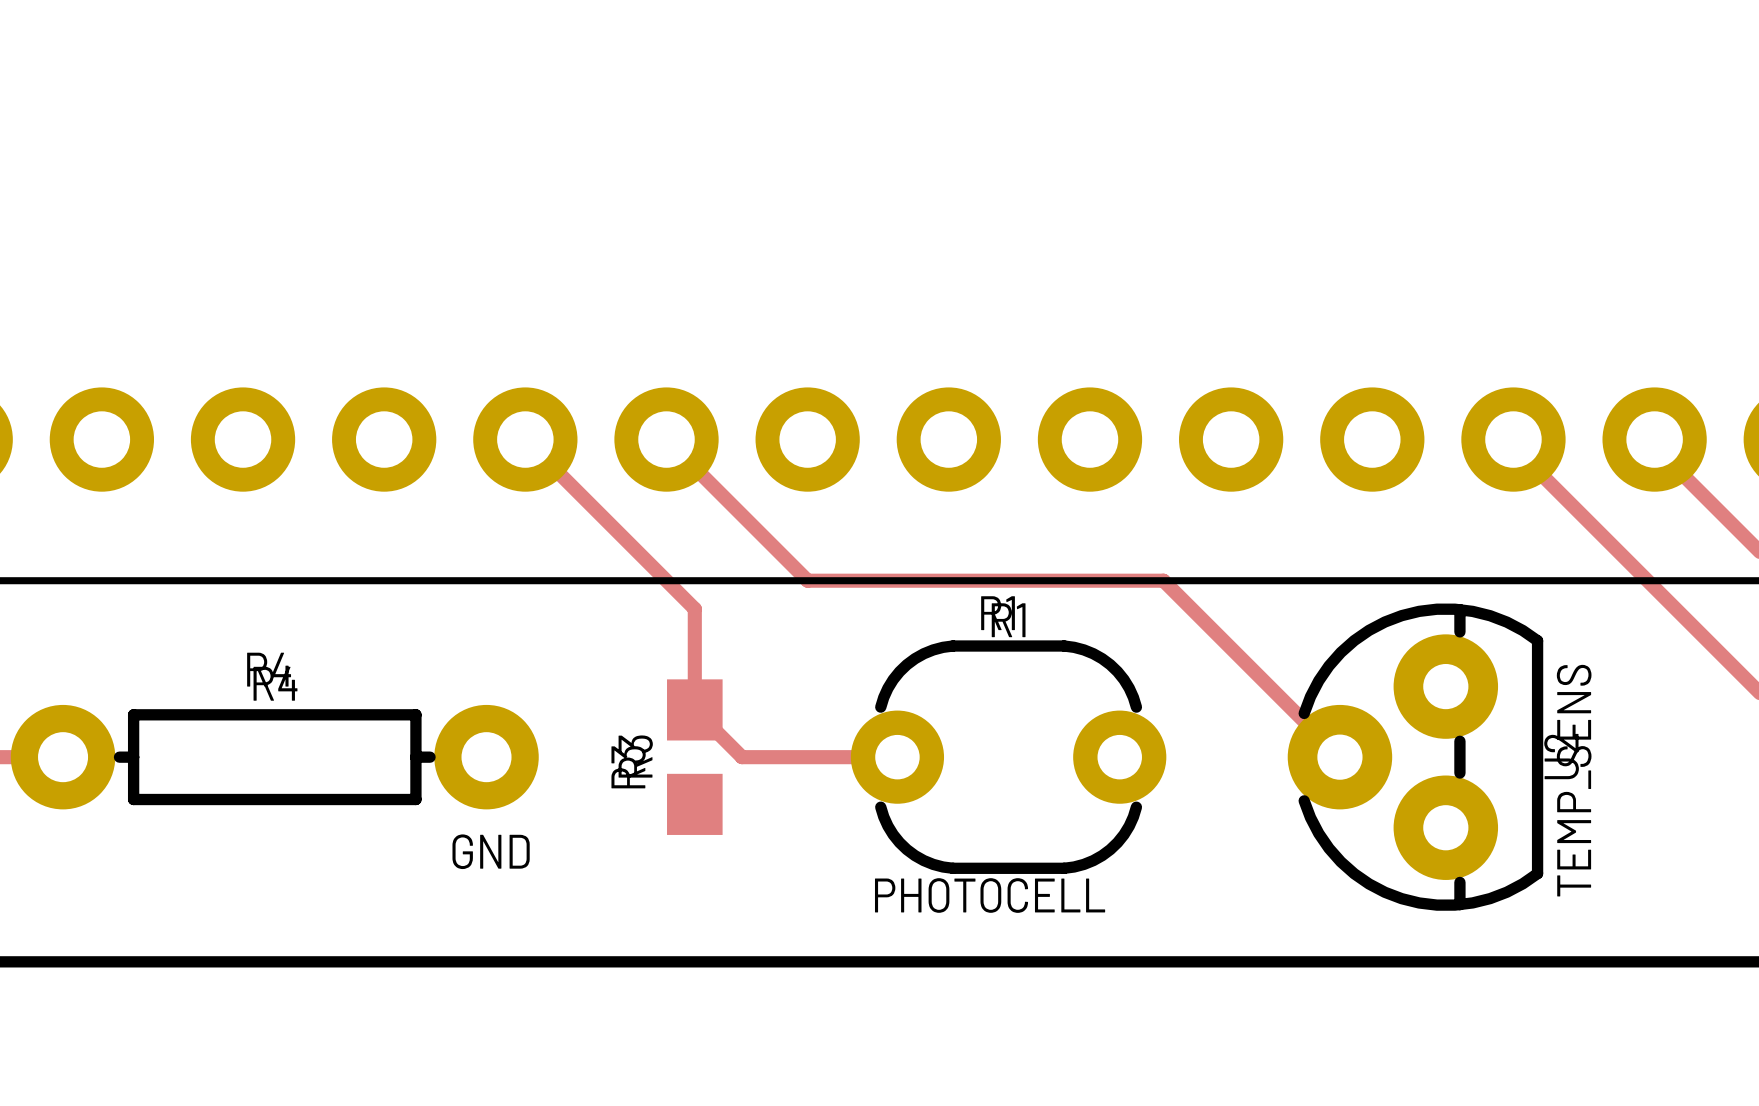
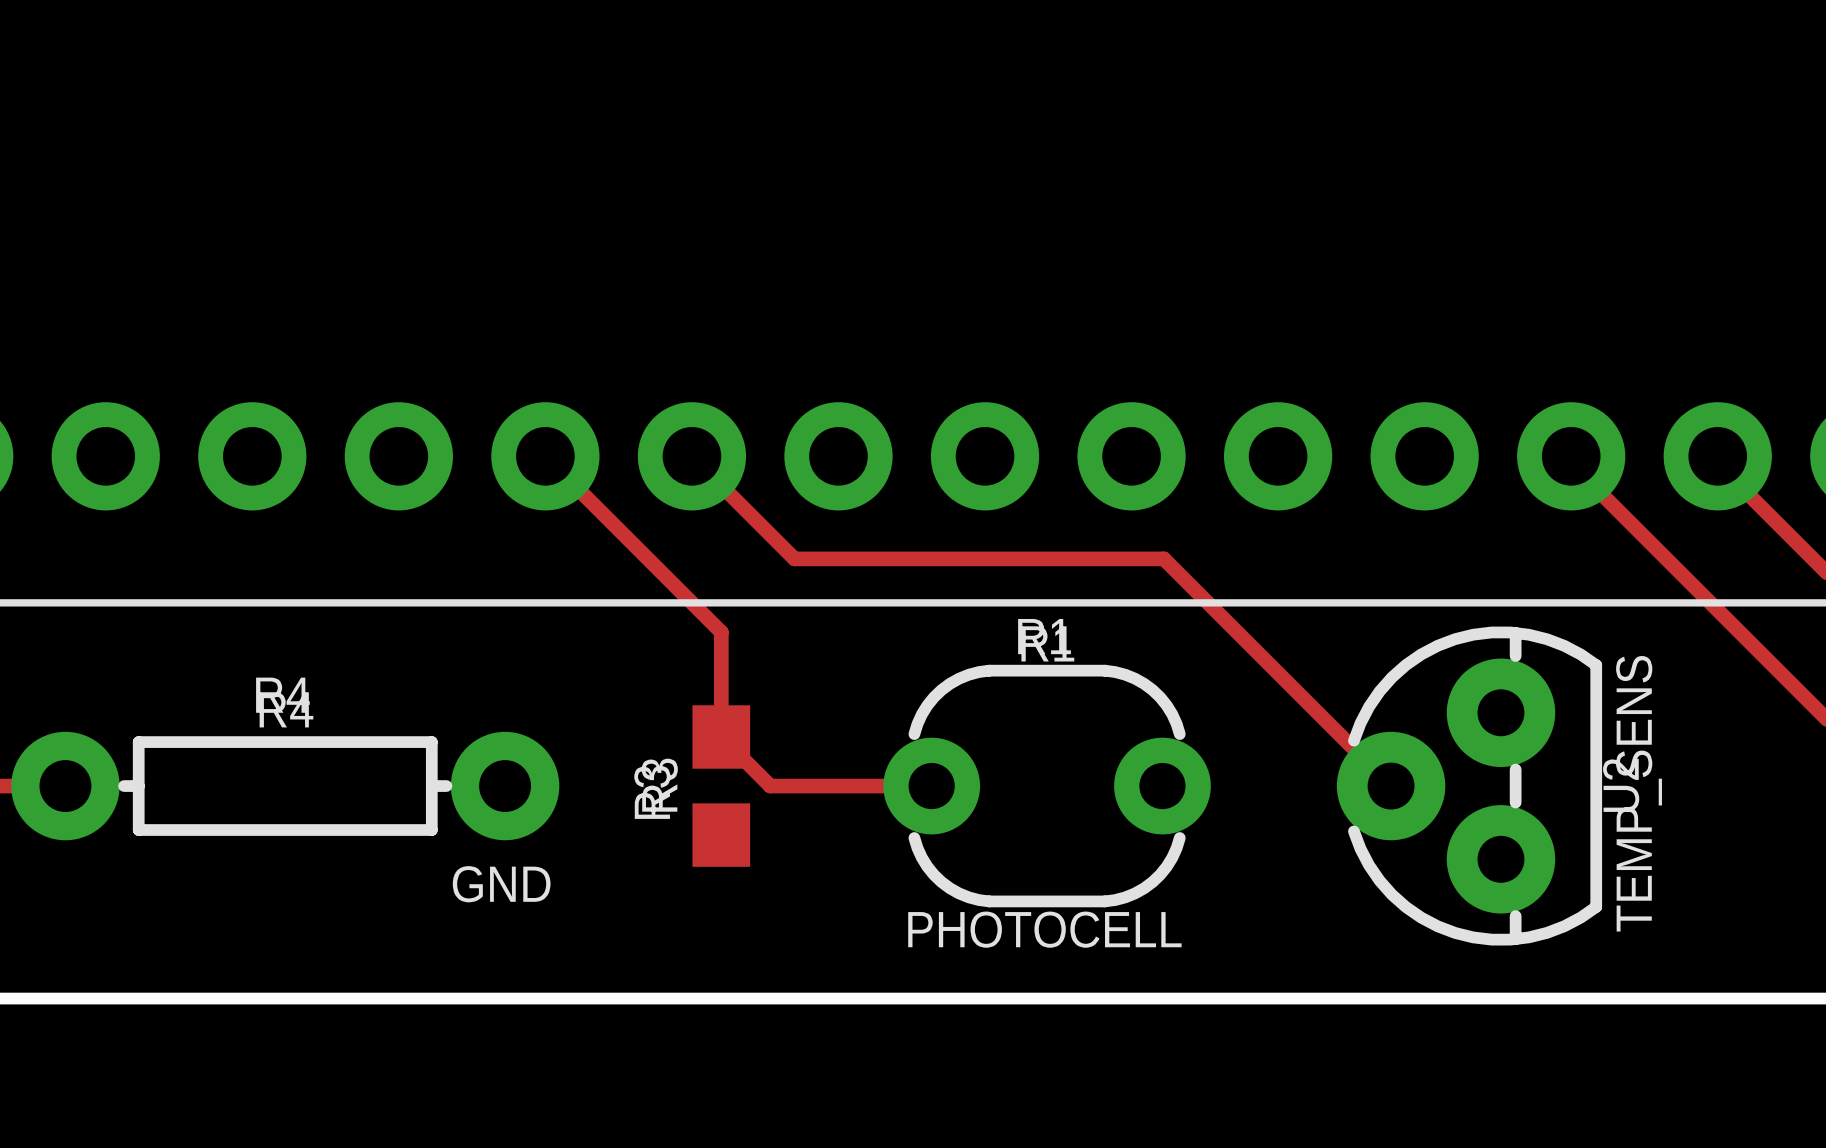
top track: (765, 538) (807, 580) (1163, 580) -> (794, 558) (1163, 558) (1207, 602)

